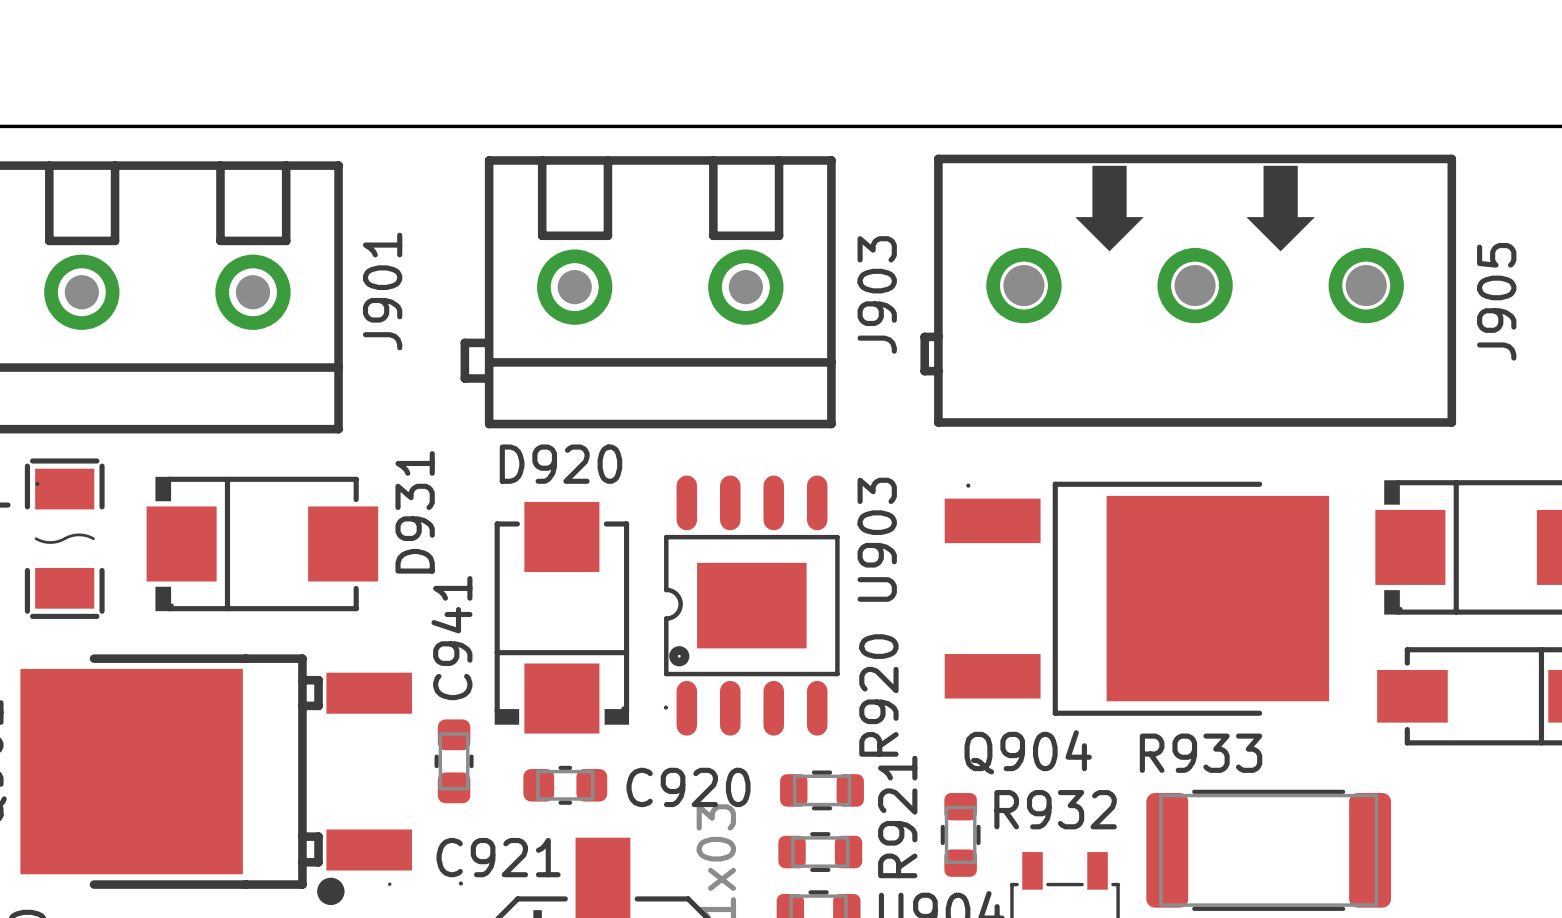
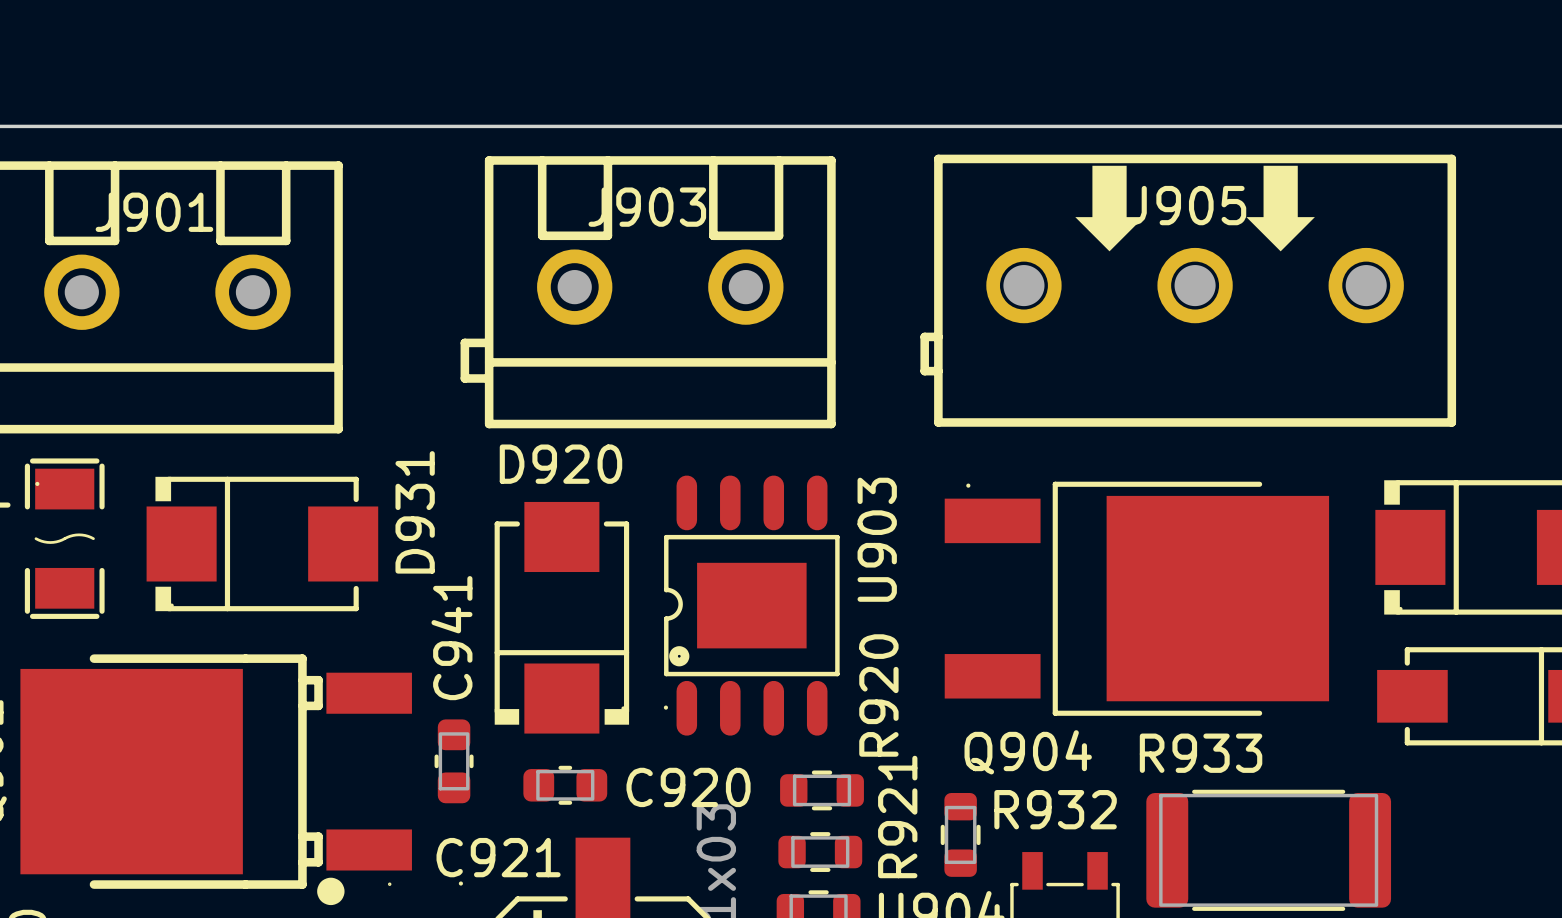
J901 name rotation: 0° (382, 291) -> 90° clockwise (154, 212)
J901 name position: J901 (382, 291) -> J901 (154, 212)
J903 name rotation: 0° (877, 294) -> 90° clockwise (647, 207)
J903 name position: J903 (877, 294) -> J903 (647, 207)
J905 name rotation: 0° (1496, 301) -> 90° clockwise (1187, 205)
J905 name position: J905 (1496, 301) -> J905 (1187, 205)

